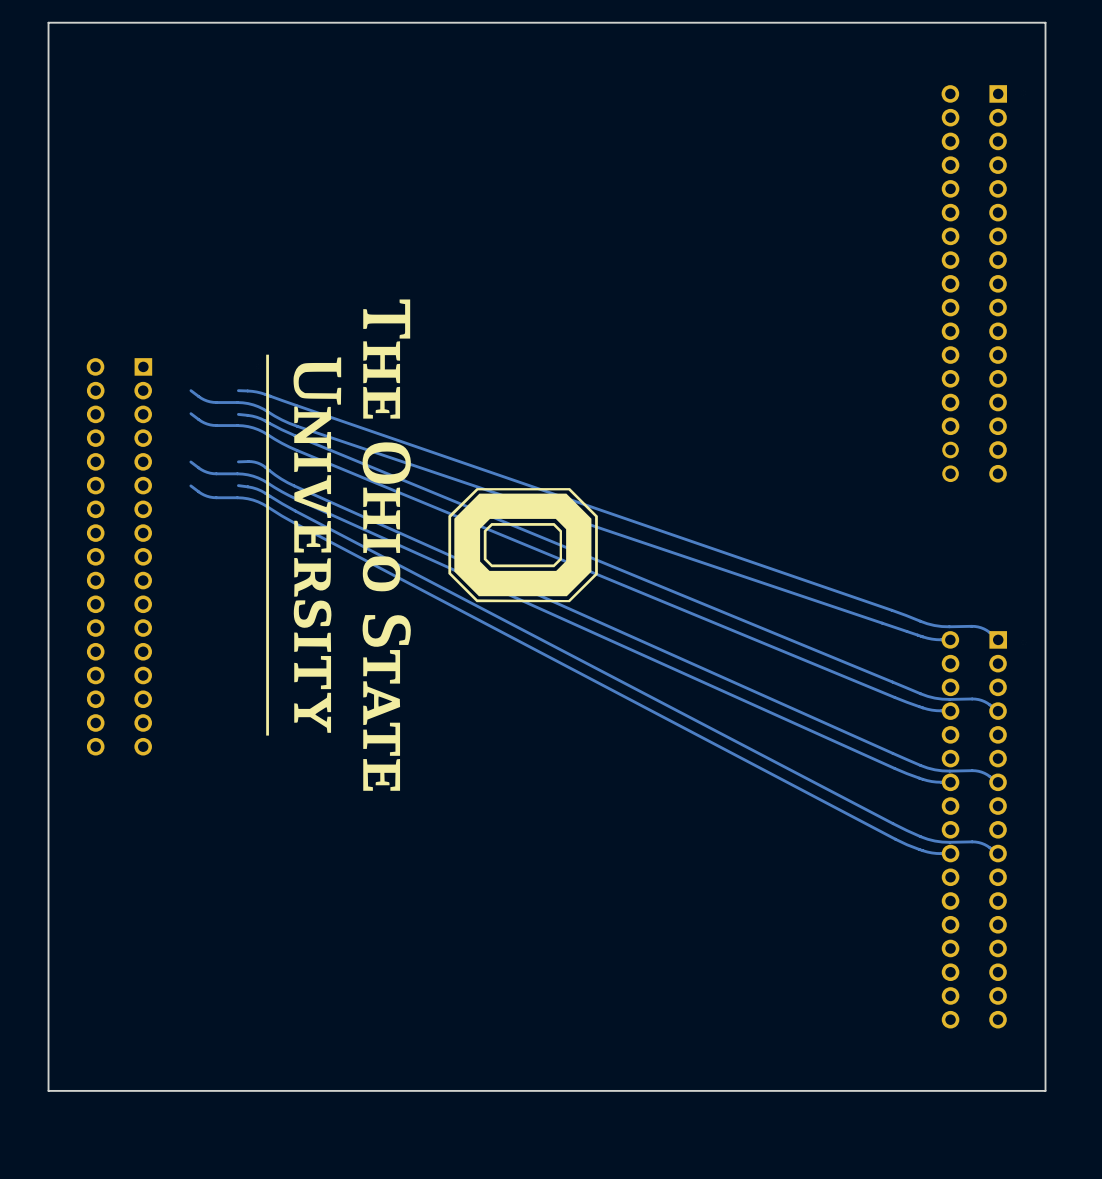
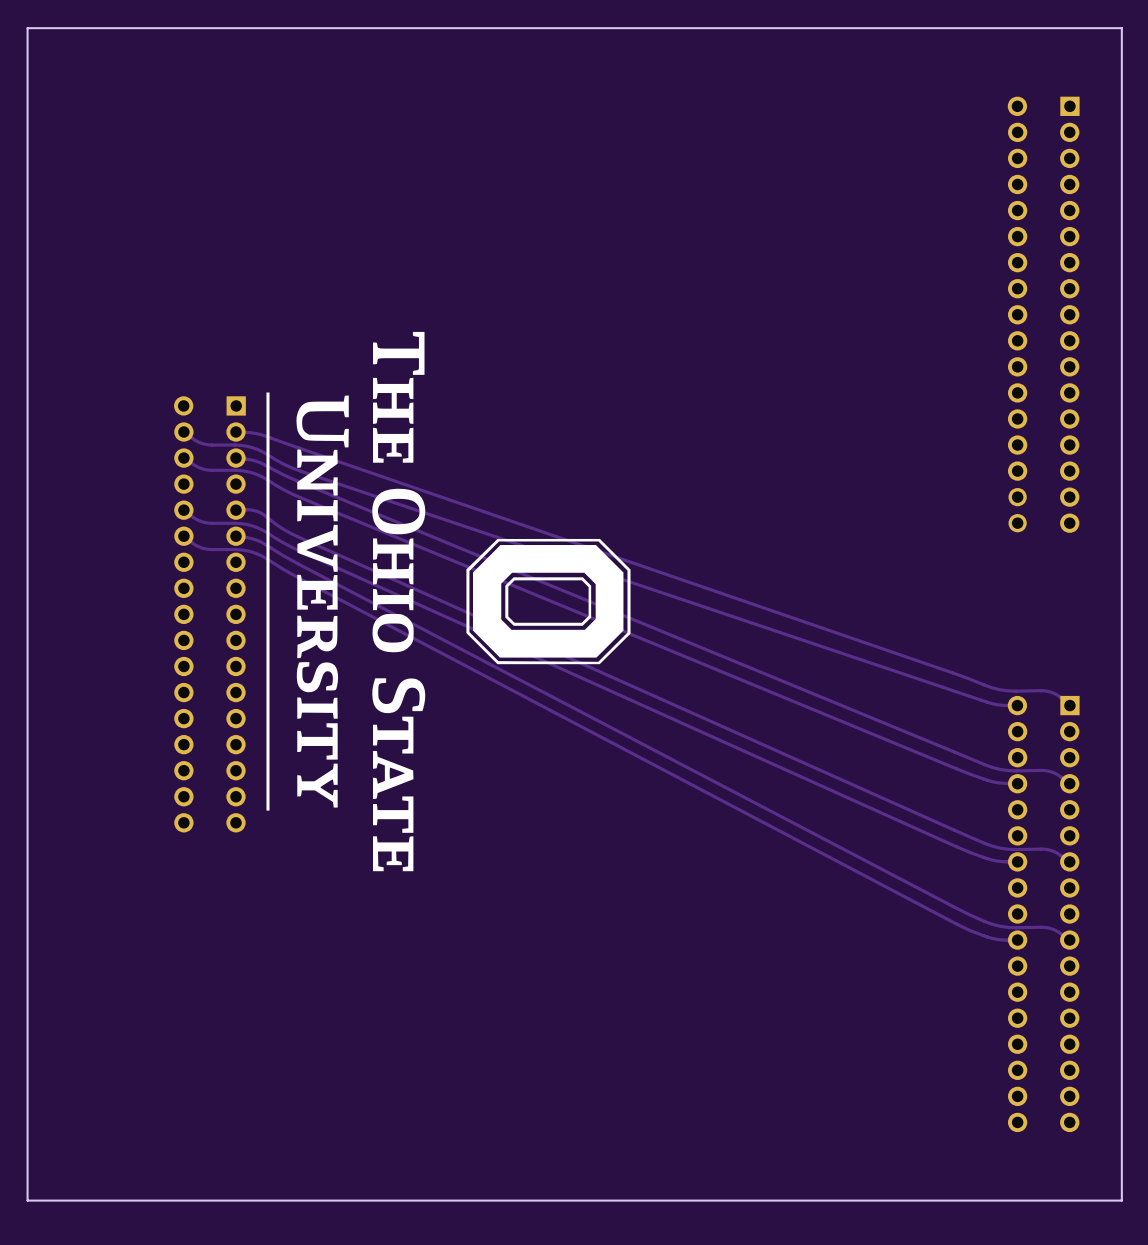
part position: (119, 556) -> (209, 614)

